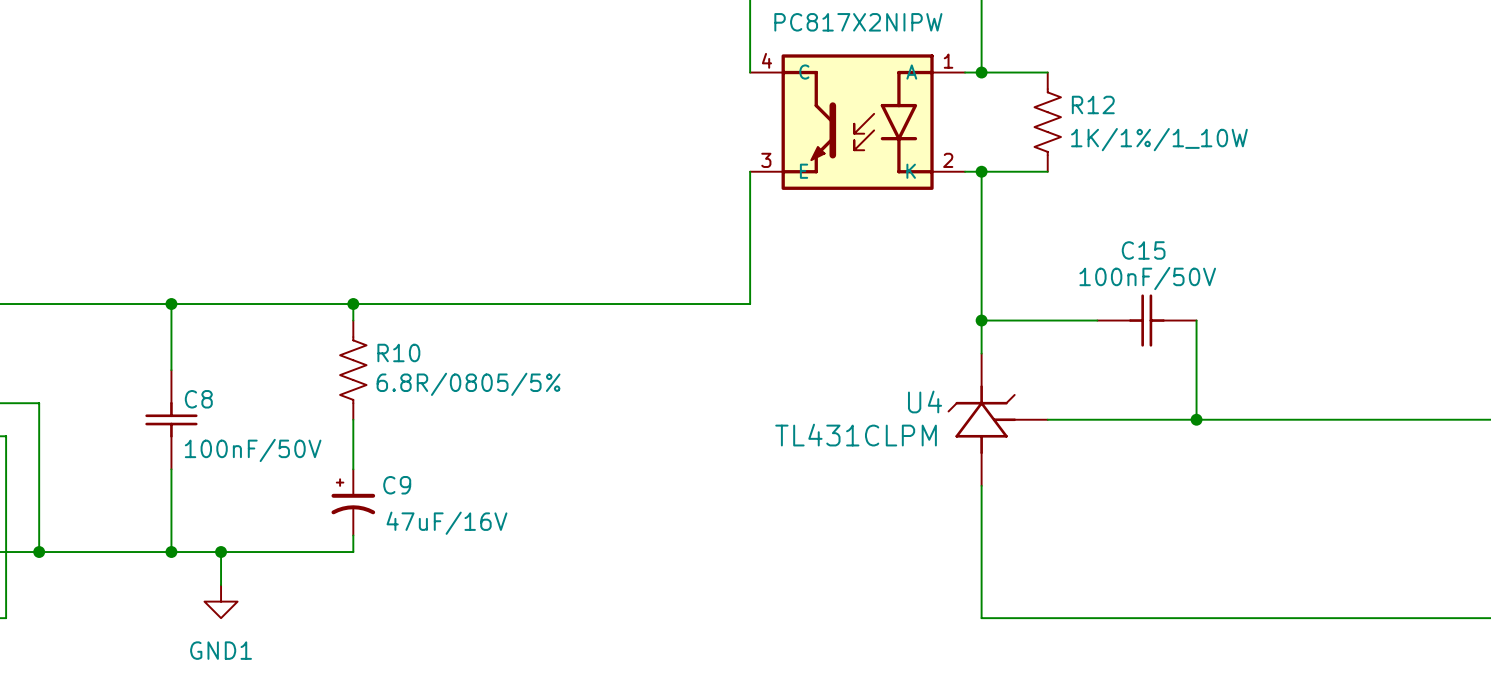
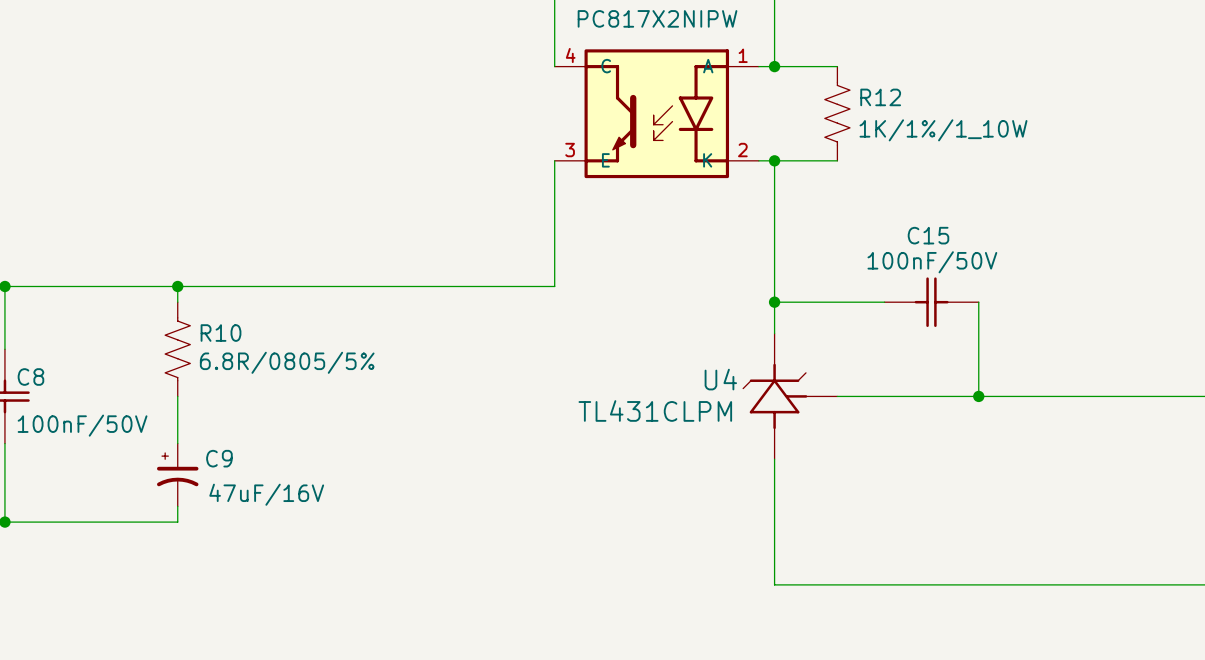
wire: (221, 552) (221, 585) -> none
junction: (221, 552) -> none
power symbol: GND1 (221, 601) -> none

